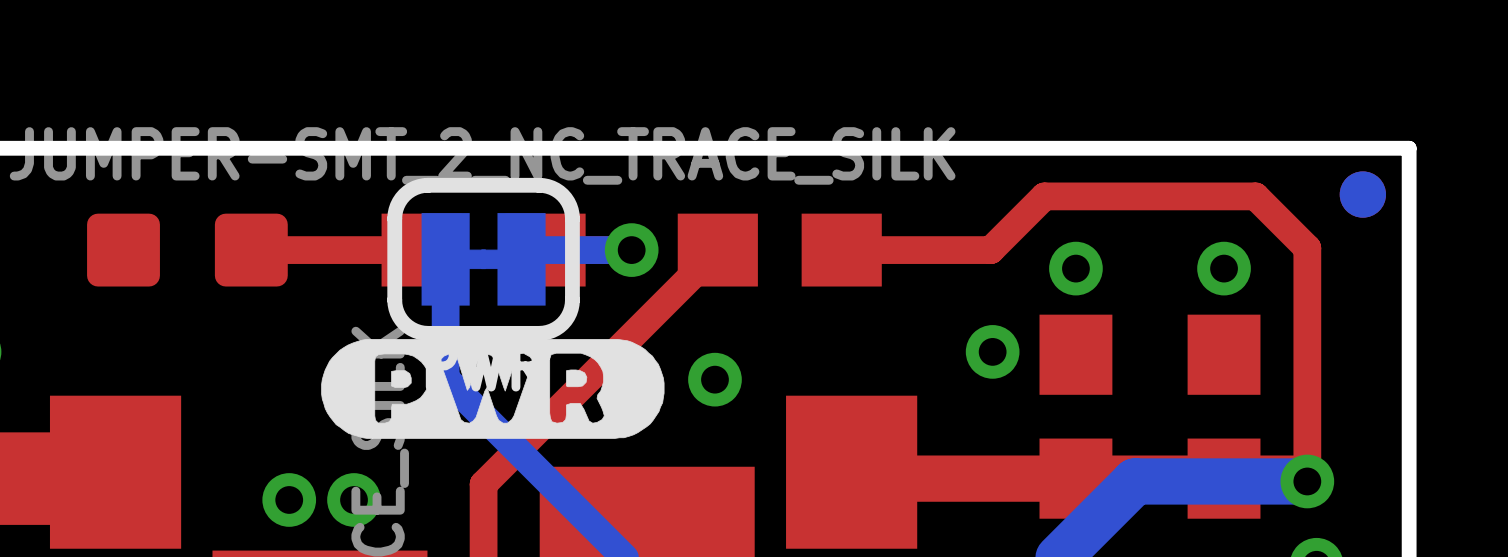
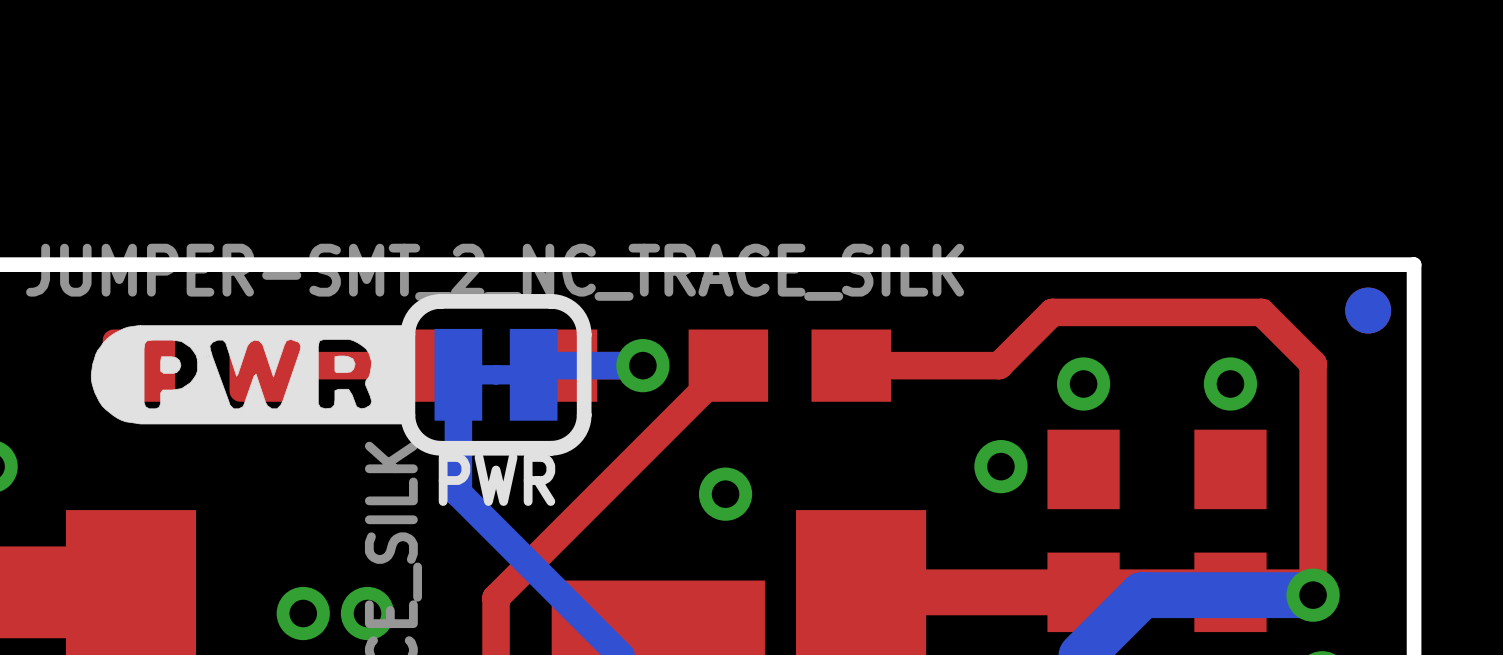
drawing: none -> [90, 325, 408, 425]
drawing: [321, 338, 665, 439] -> none

